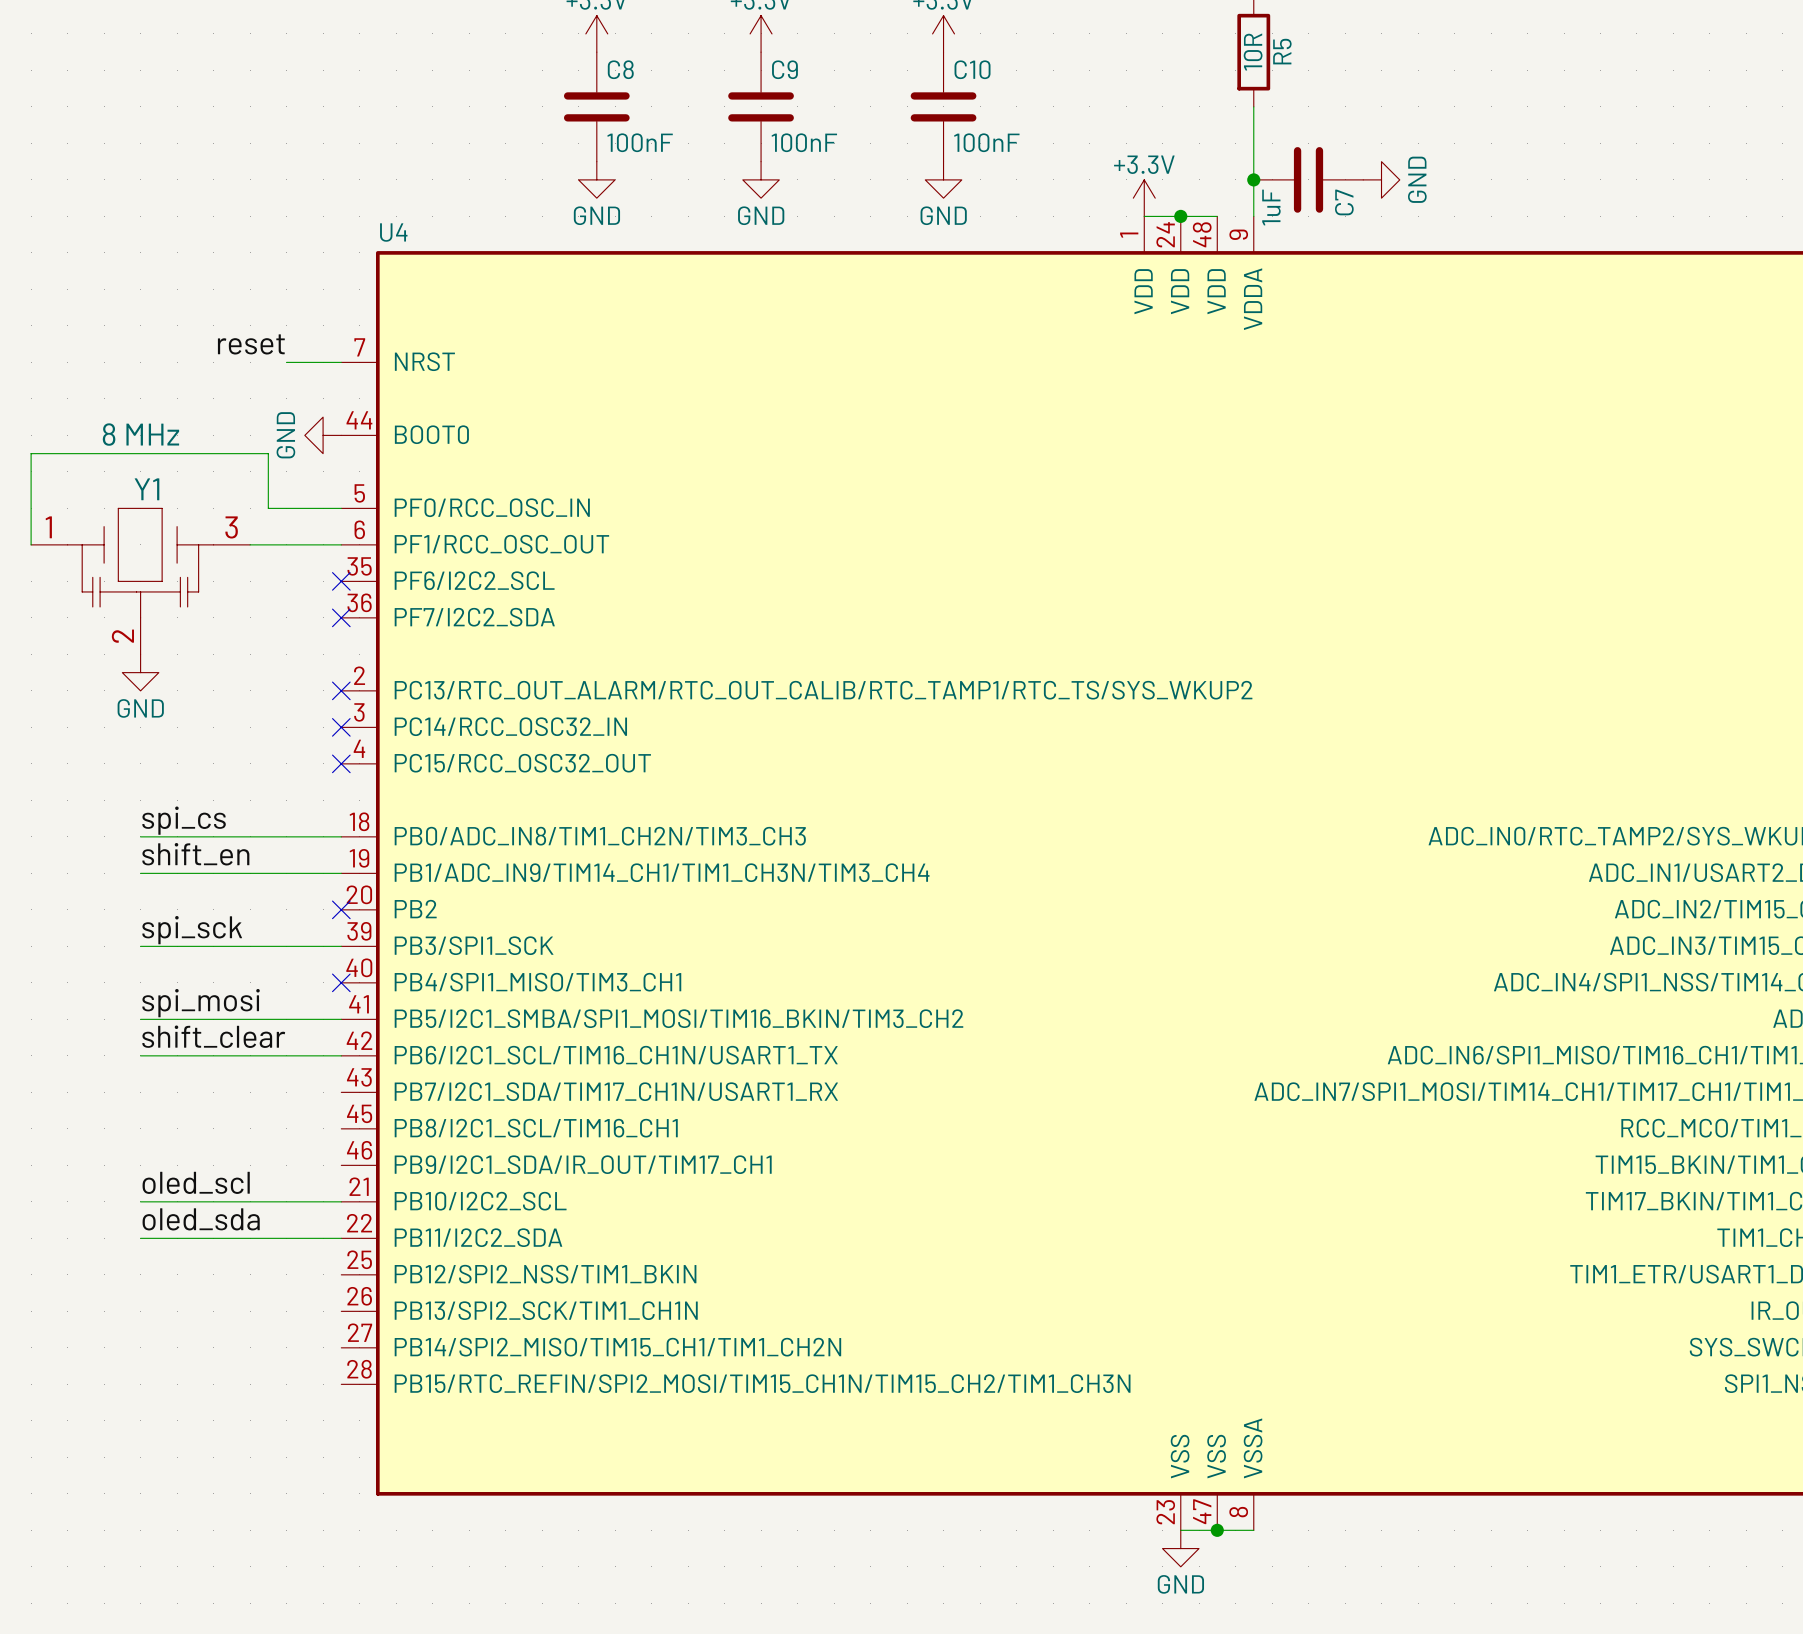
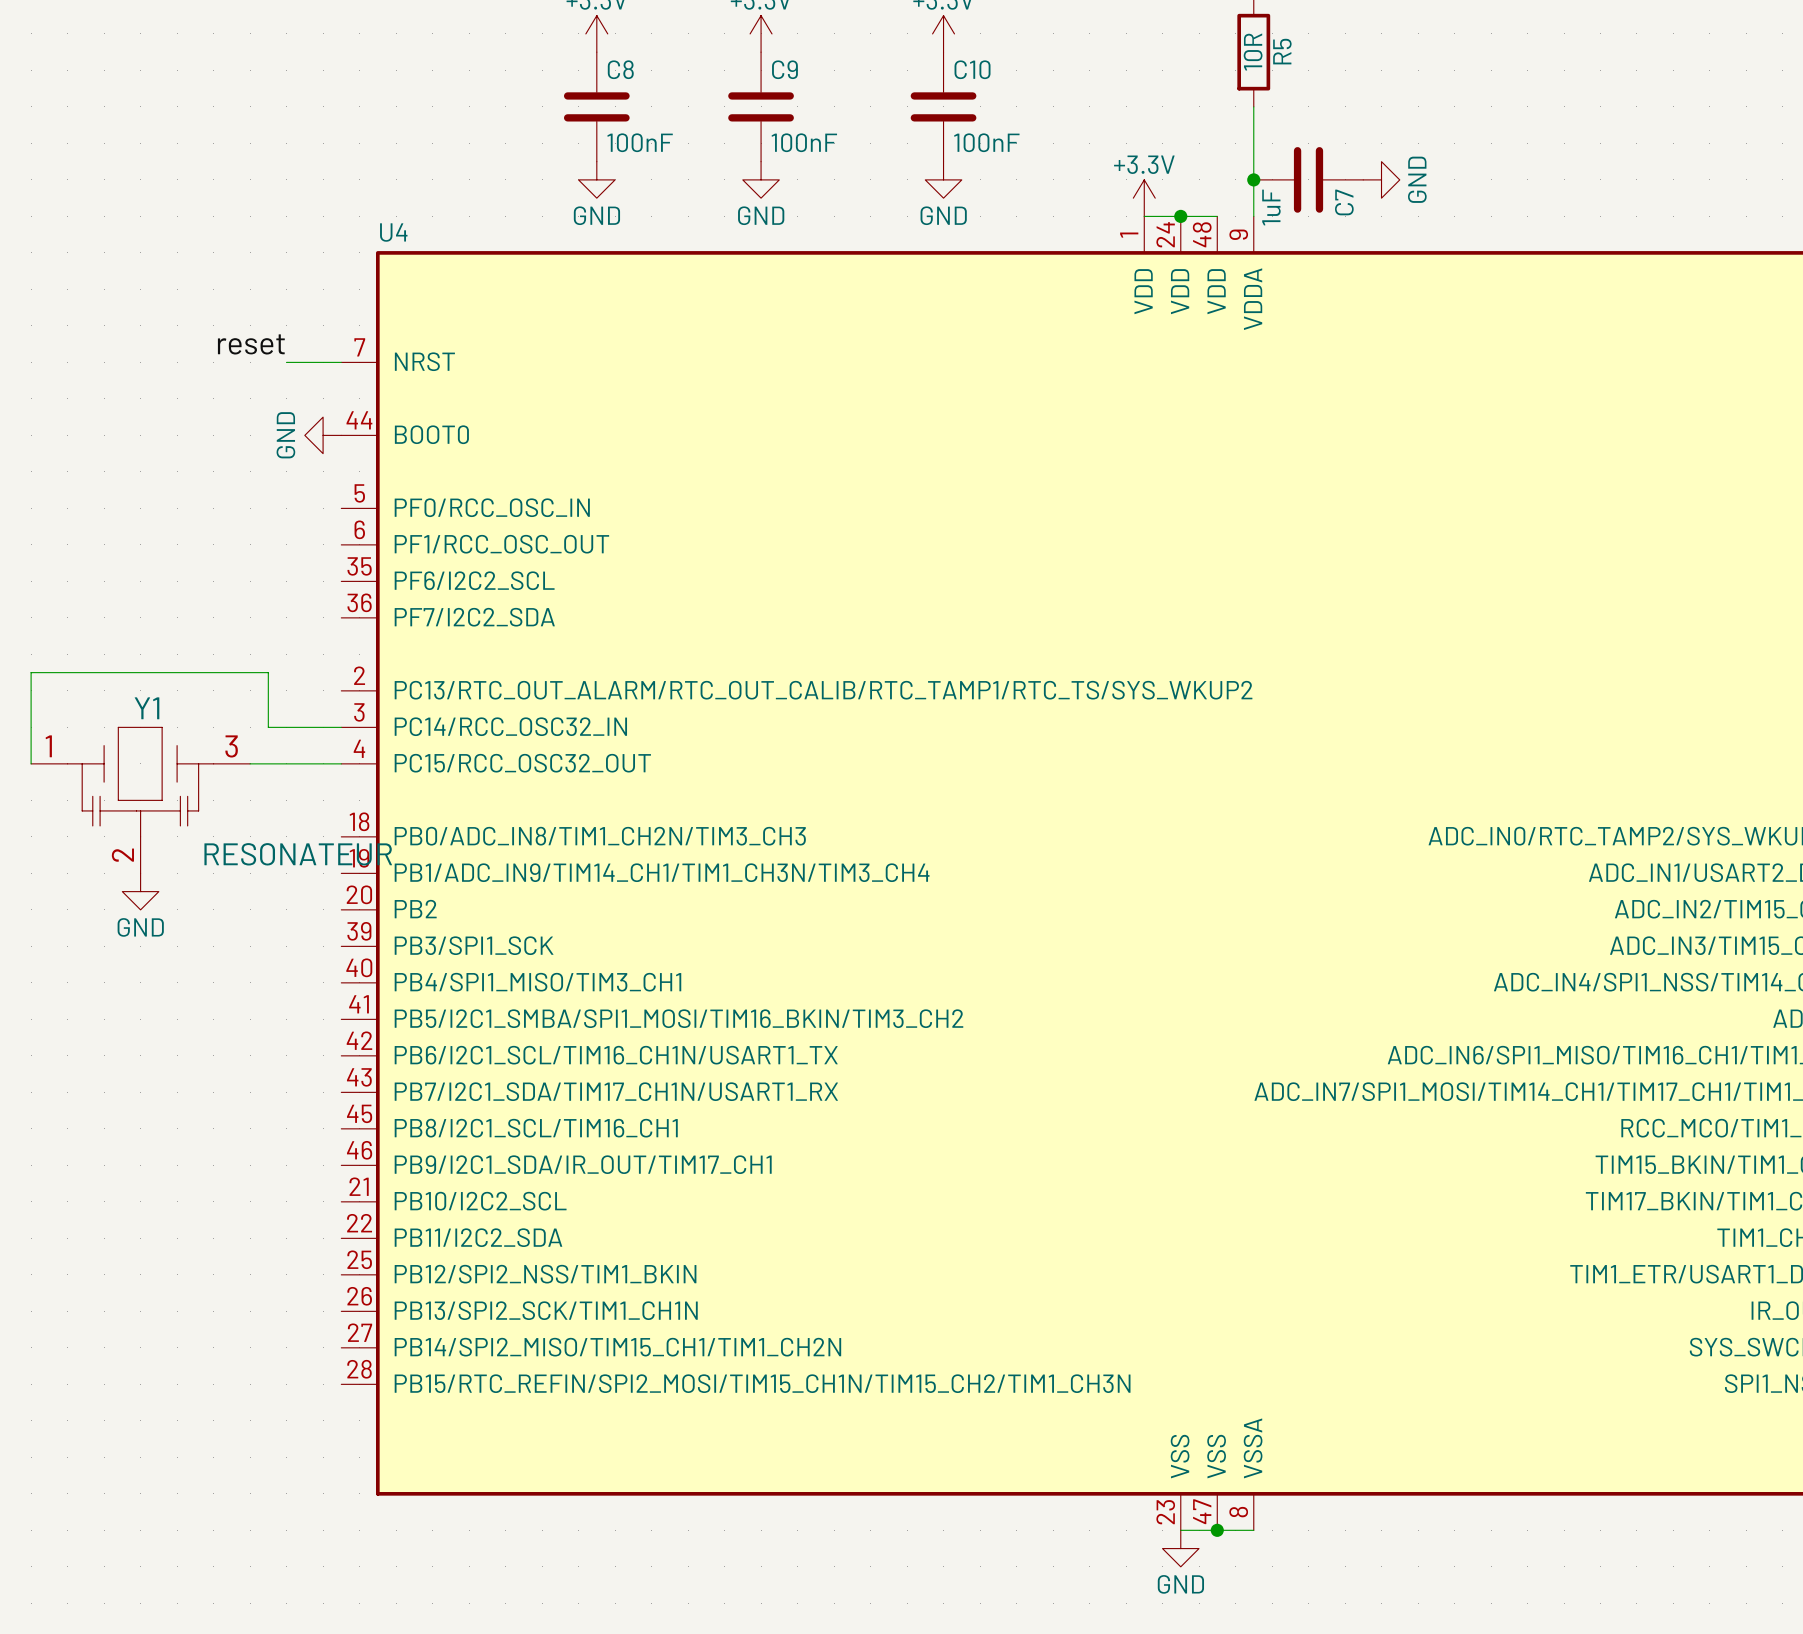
Y1 value: 8 MHz (140, 434) -> RESONATEUR (298, 854)
wire: (341, 508) (268, 508) (268, 453) (31, 453) (31, 544) -> (341, 727) (268, 727) (268, 672) (31, 672) (31, 763)
wire: (250, 544) (341, 544) -> (250, 763) (341, 763)
Y1 position: (140, 581) -> (140, 800)
no-connect mark: (341, 581) -> none
no-connect mark: (341, 617) -> none
power symbol position: GND (140, 672) -> GND (140, 891)
no-connect mark: (341, 690) -> none
no-connect mark: (341, 727) -> none
no-connect mark: (341, 763) -> none
label: spi_cs (184, 820) -> none
wire: (140, 836) (341, 836) -> none
label: shift_en (195, 854) -> none
wire: (140, 873) (341, 873) -> none
no-connect mark: (341, 909) -> none
label: spi_sck (192, 930) -> none
wire: (140, 946) (341, 946) -> none
no-connect mark: (341, 982) -> none
label: spi_mosi (201, 1003) -> none
wire: (140, 1019) (341, 1019) -> none
label: shift_clear (213, 1036) -> none
wire: (140, 1055) (341, 1055) -> none
label: oled_scl (196, 1182) -> none
wire: (140, 1201) (341, 1201) -> none
label: oled_sda (201, 1219) -> none
wire: (140, 1238) (341, 1238) -> none

